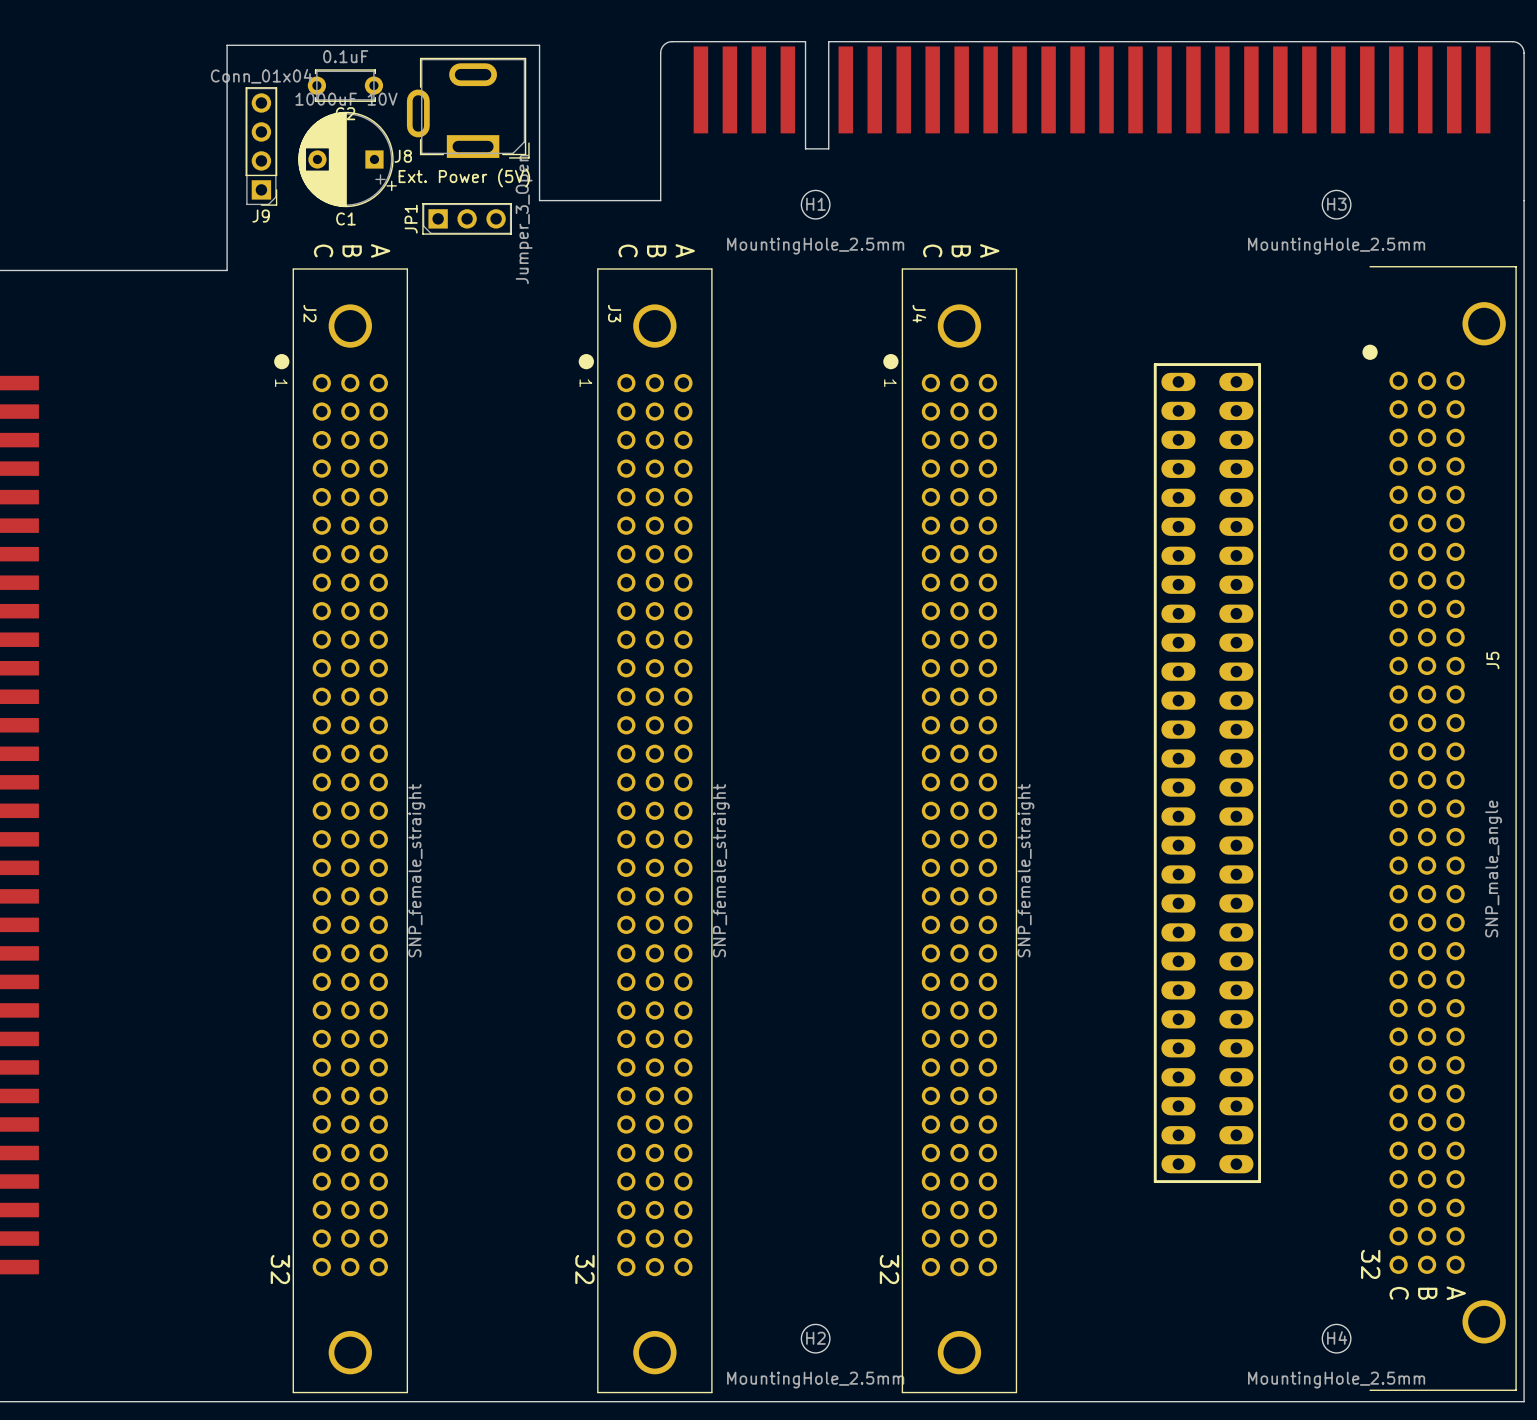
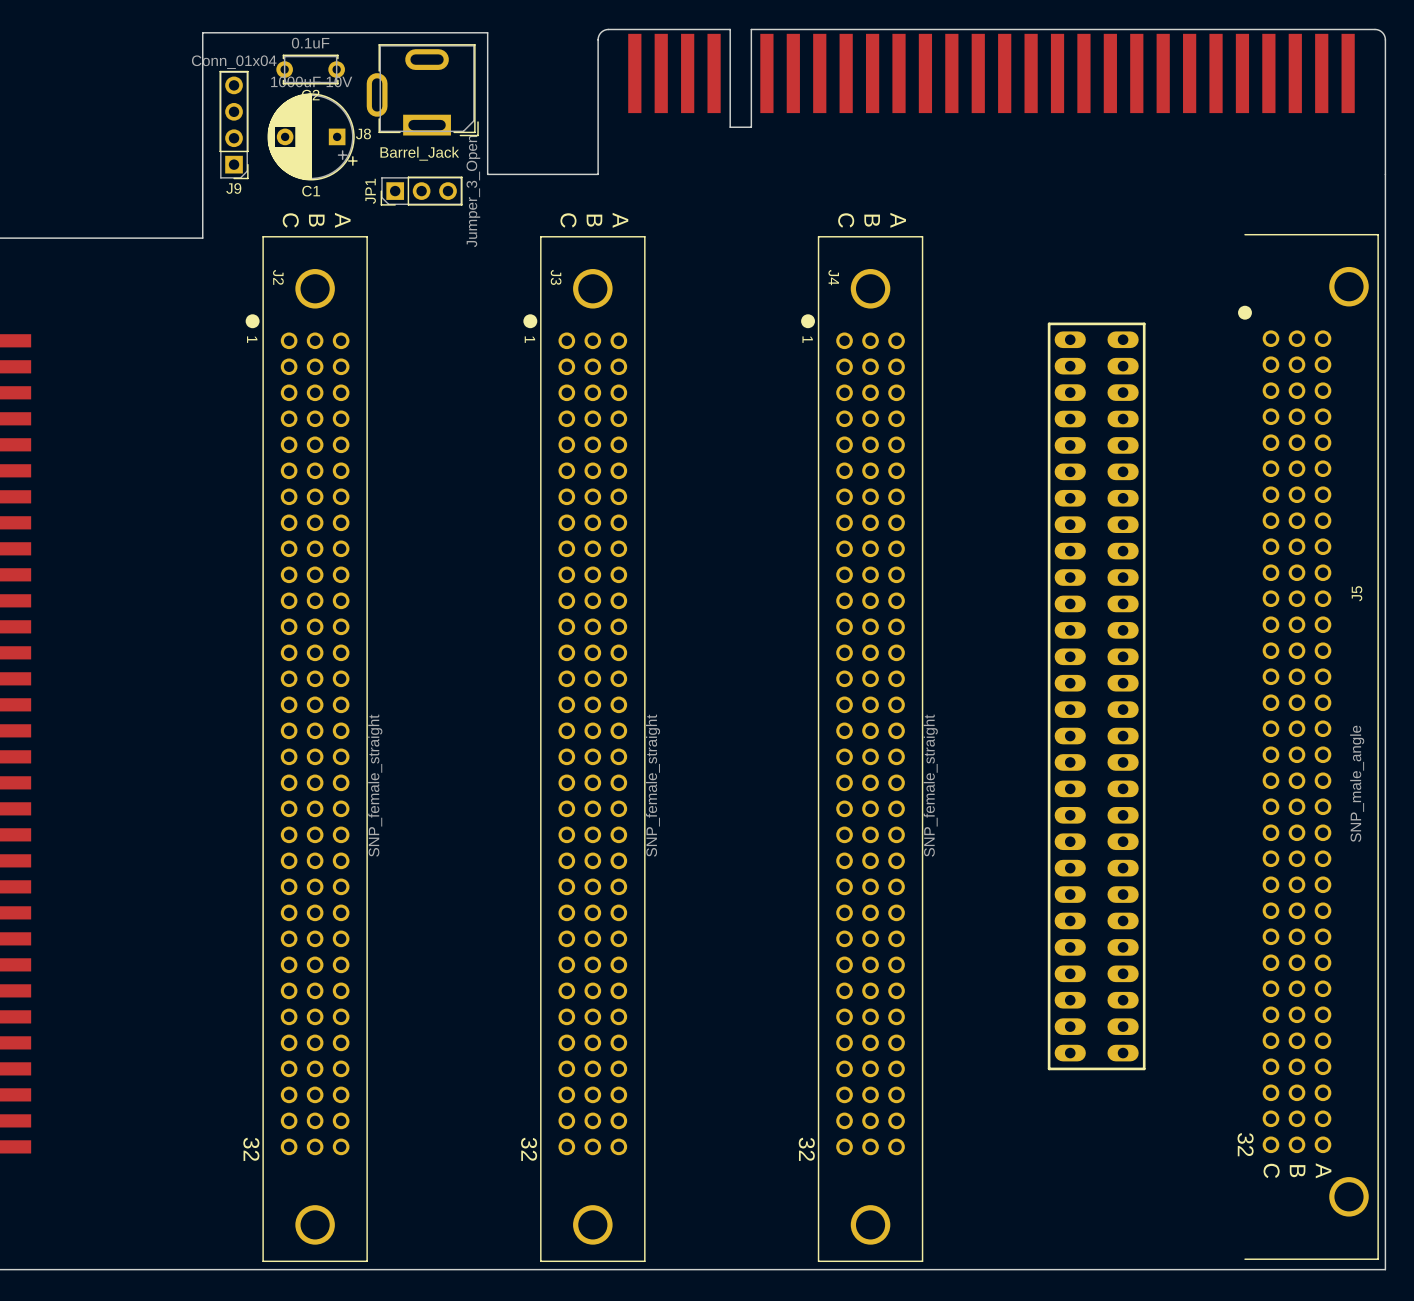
J8 value: Ext. Power (5V) (464, 177) -> Barrel_Jack (419, 153)
JP1 footprint: [422, 203, 512, 235] -> [380, 176, 463, 206]
H1: MountingHole_2.5mm (815, 204) -> none
H3: MountingHole_2.5mm (1336, 204) -> none
H2: MountingHole_2.5mm (815, 1338) -> none
H4: MountingHole_2.5mm (1336, 1338) -> none

